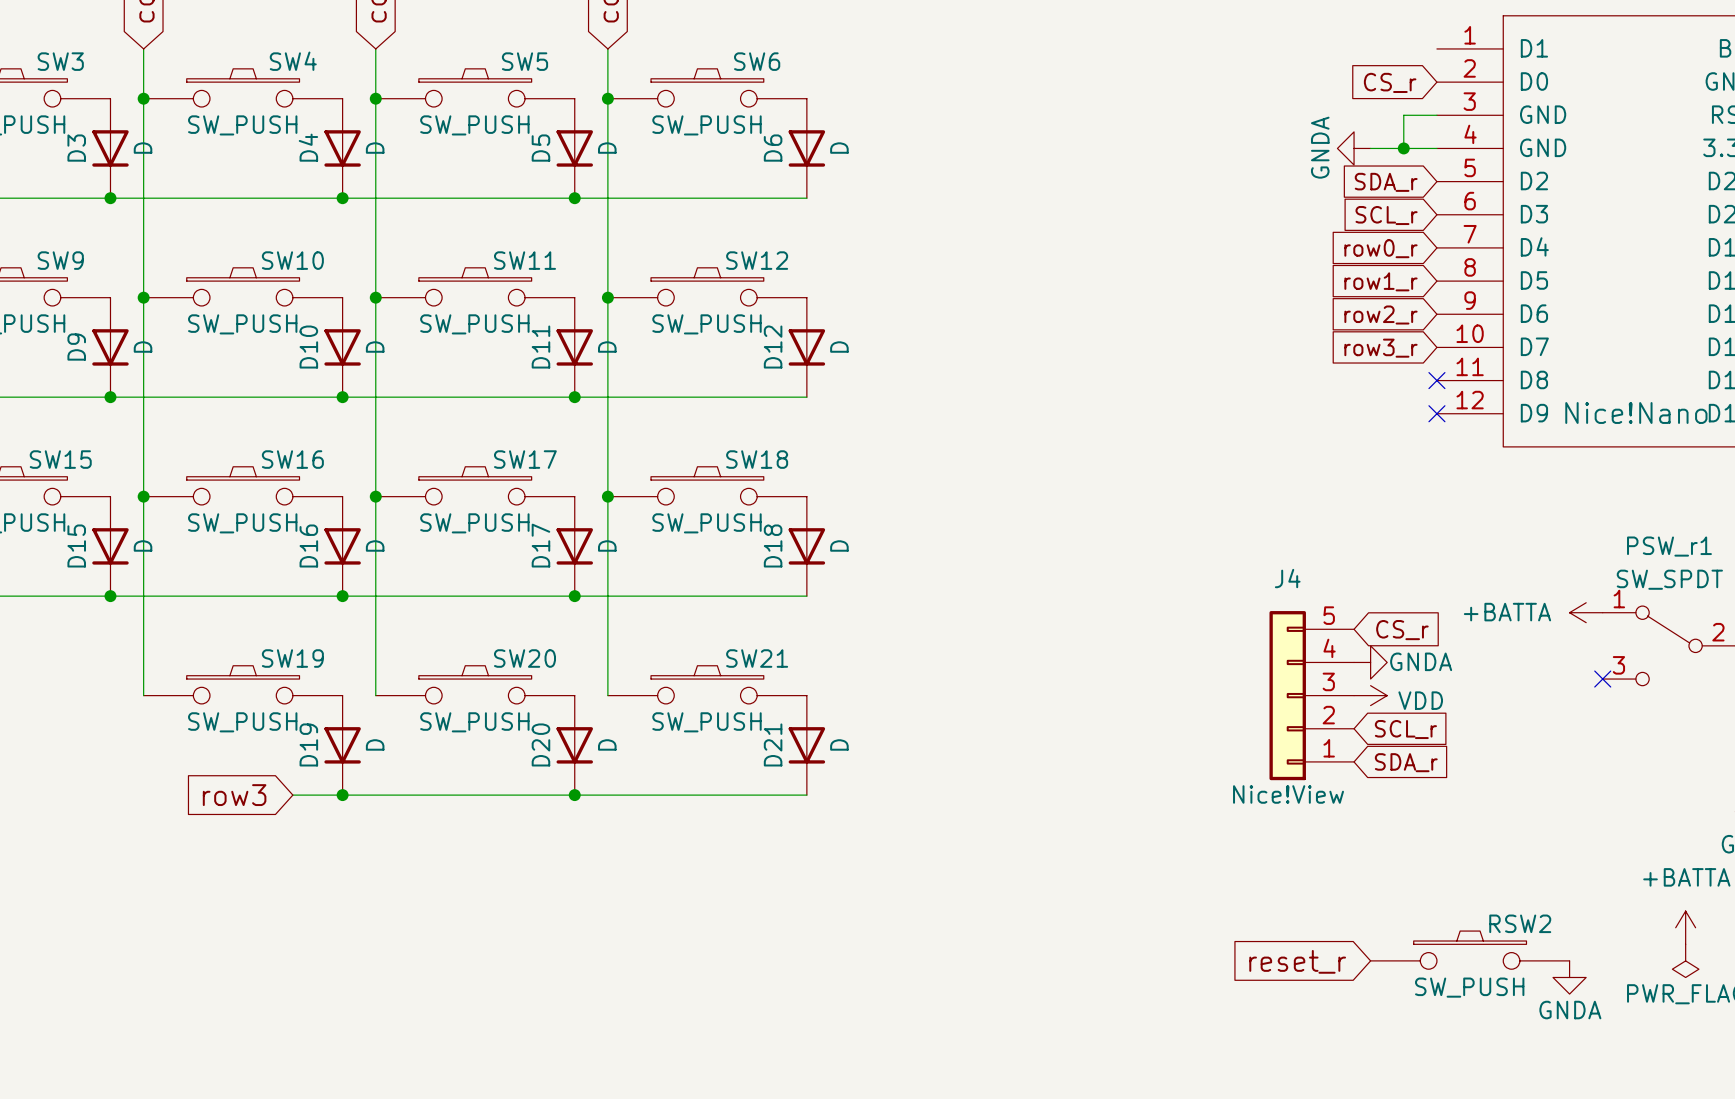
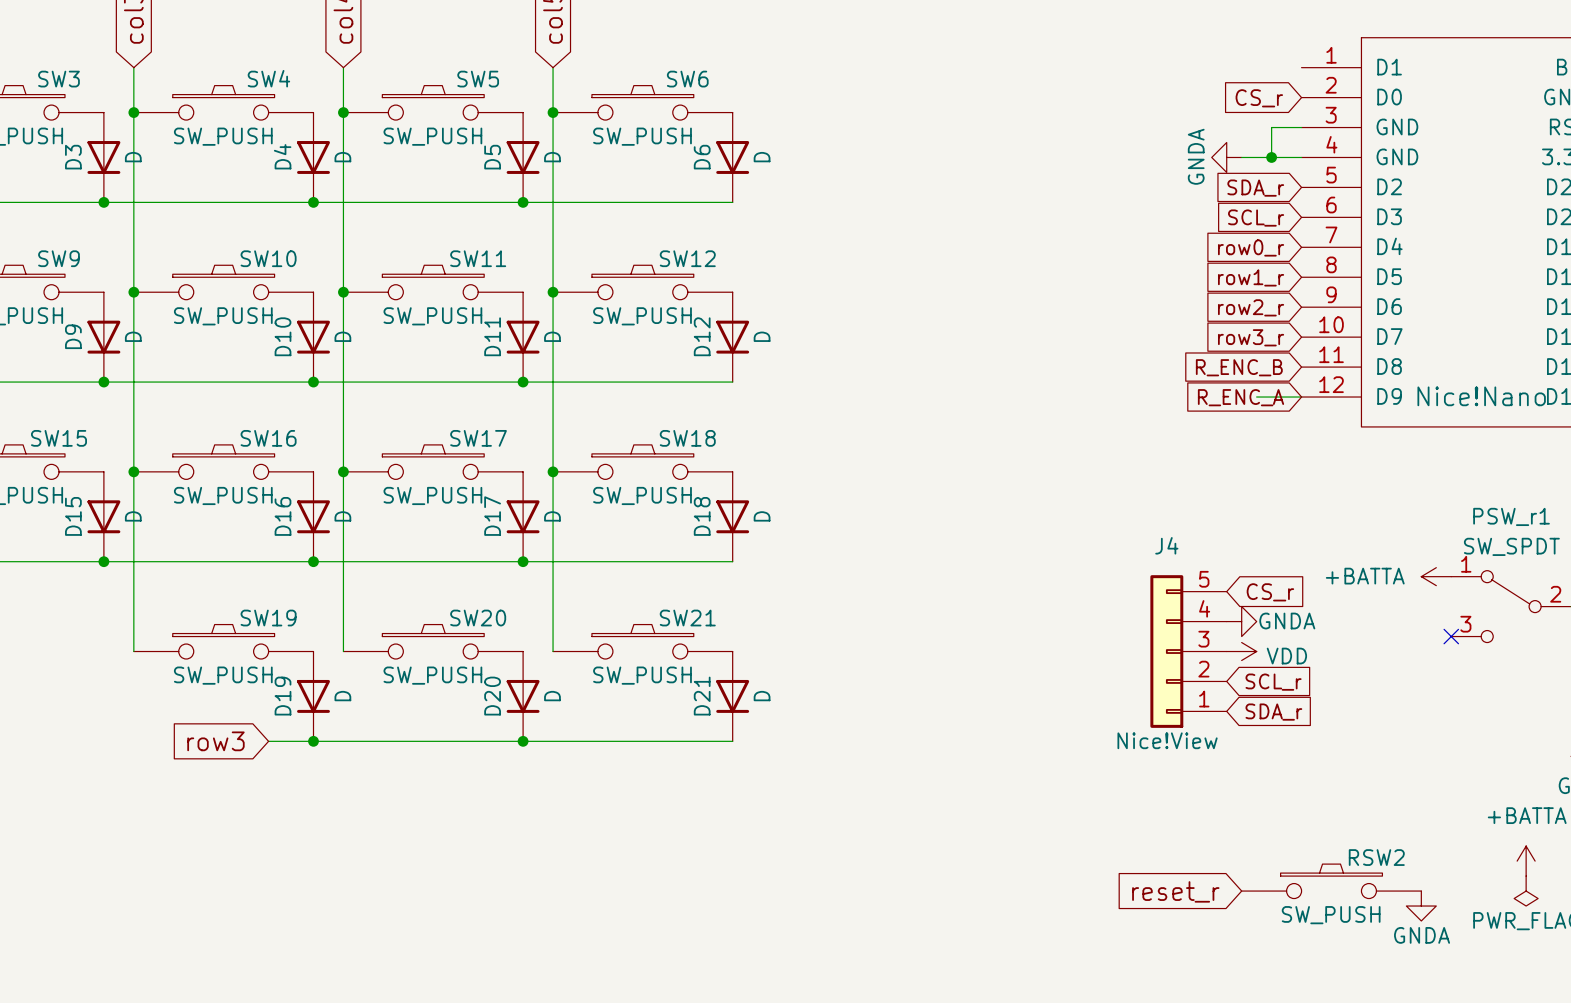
no-connect mark: (1436, 380) -> none
global label: none -> R_ENC_B (1239, 367)
wire: none -> (1256, 397) (1301, 397)
no-connect mark: (1436, 413) -> none
global label: none -> R_ENC_A (1240, 397)

